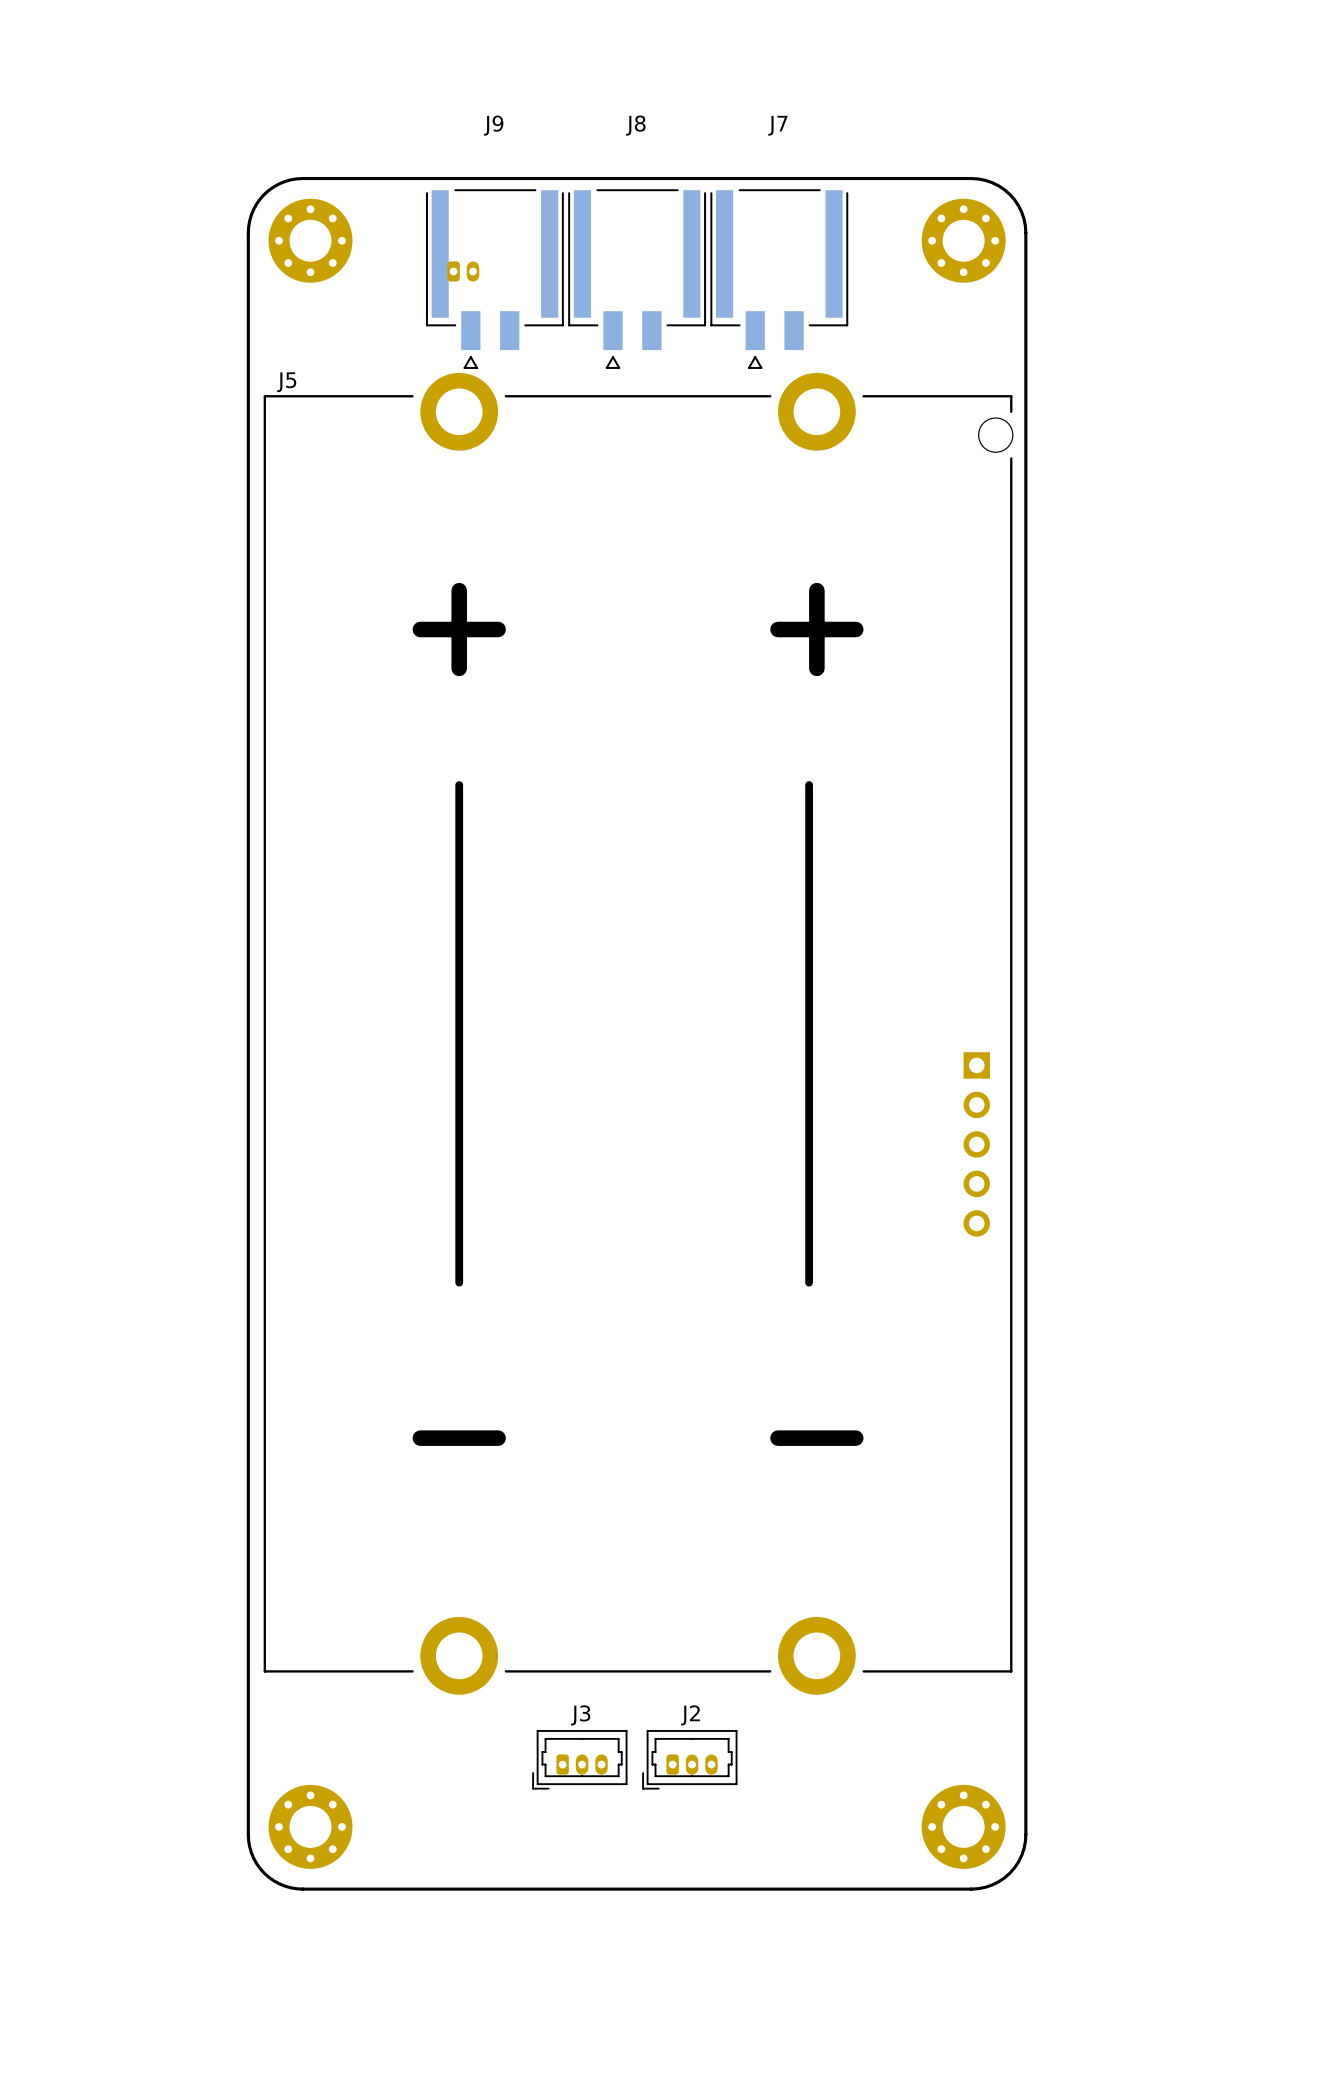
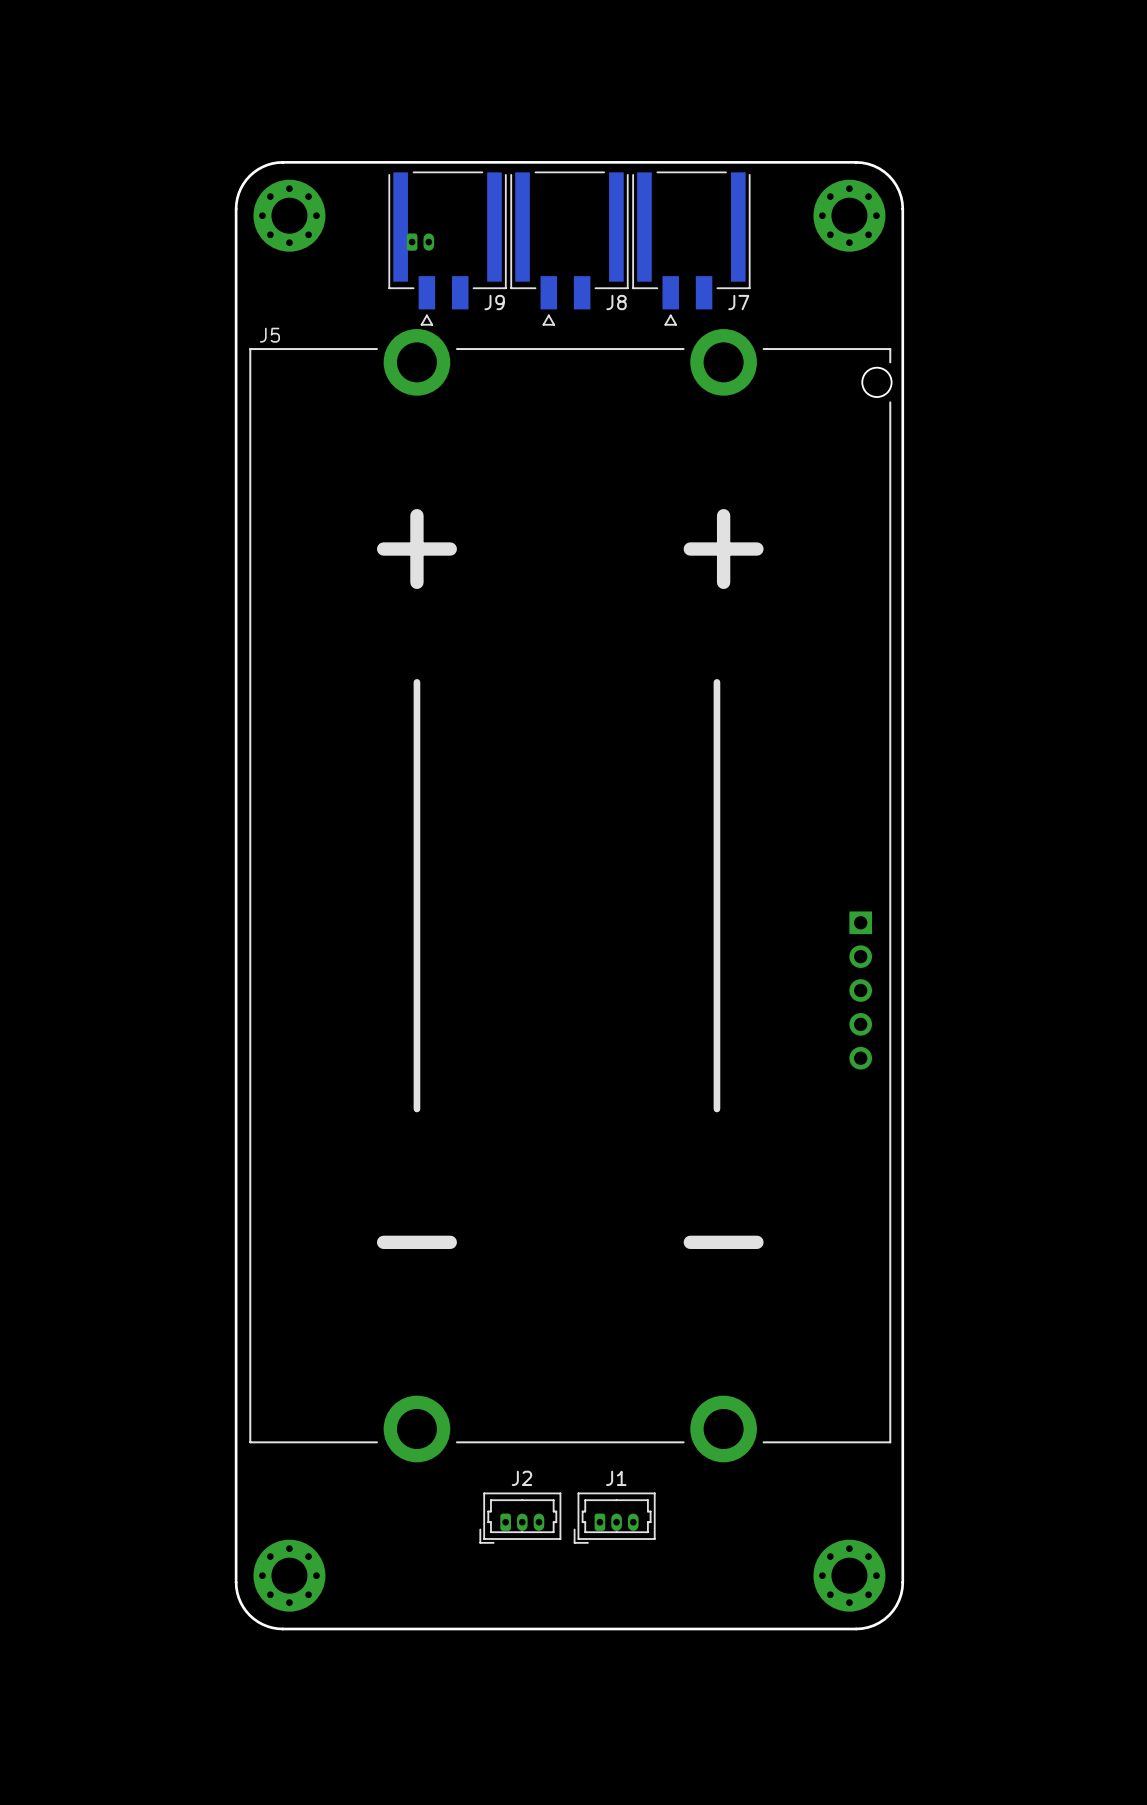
J9 name position: J9 (493, 125) -> J9 (494, 302)
J8 name position: J8 (635, 125) -> J8 (616, 302)
J7 name position: J7 (777, 125) -> J7 (738, 302)
J3 name: J3 (580, 1715) -> J2 (521, 1478)
J2 name: J2 (690, 1715) -> J1 (616, 1478)

